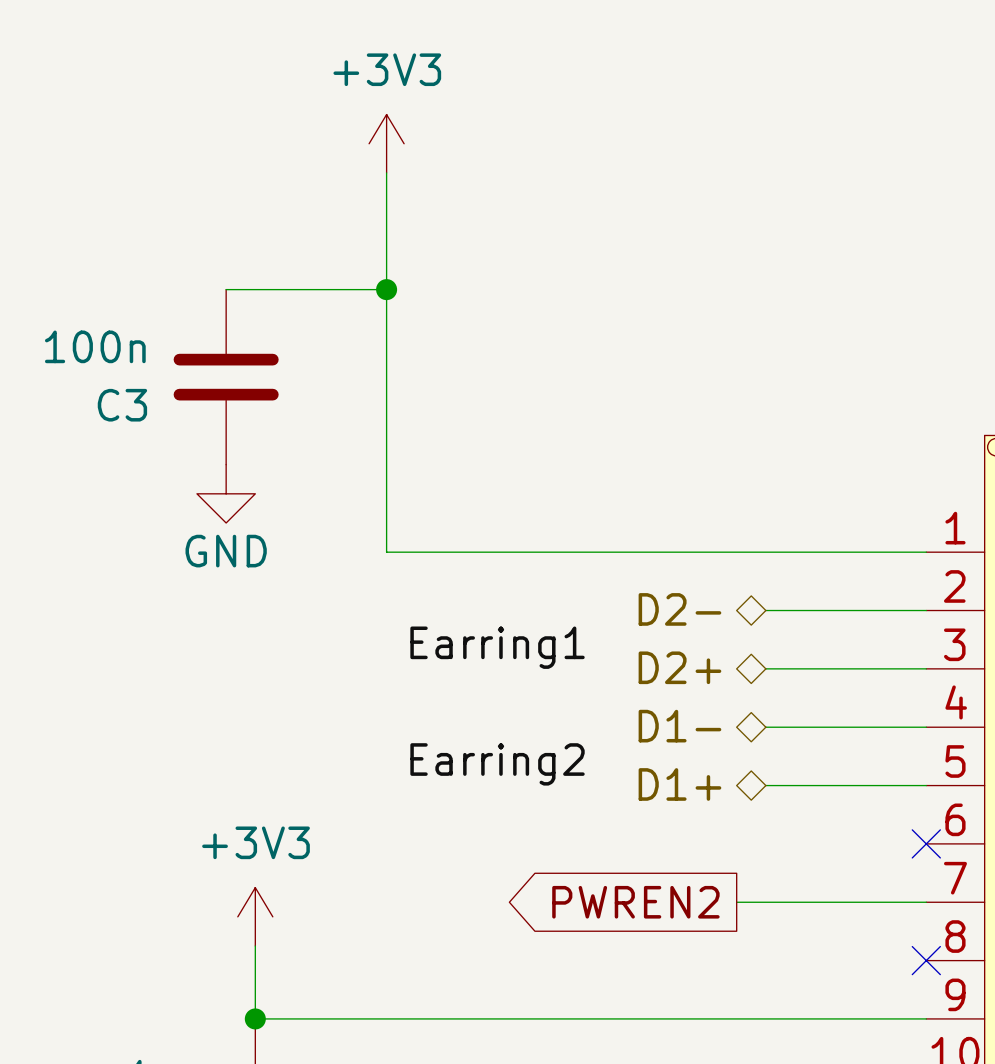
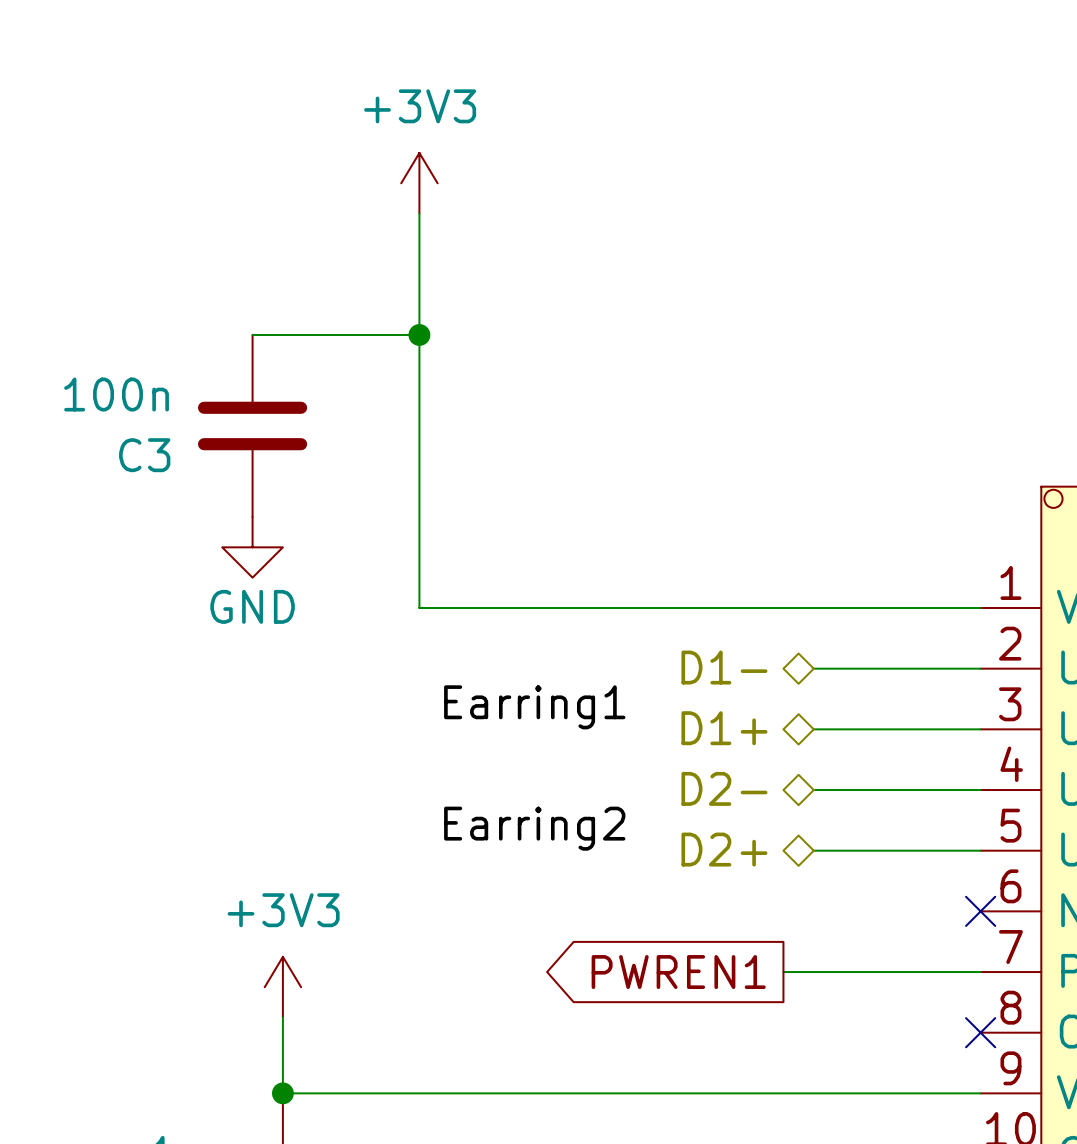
hierarchical label: D2- (679, 609) -> D1- (724, 667)
hierarchical label: D2+ (679, 667) -> D1+ (724, 728)
hierarchical label: D1- (679, 726) -> D2- (724, 788)
hierarchical label: D1+ (679, 784) -> D2+ (724, 849)
global label: PWREN2 (635, 902) -> PWREN1 (678, 972)

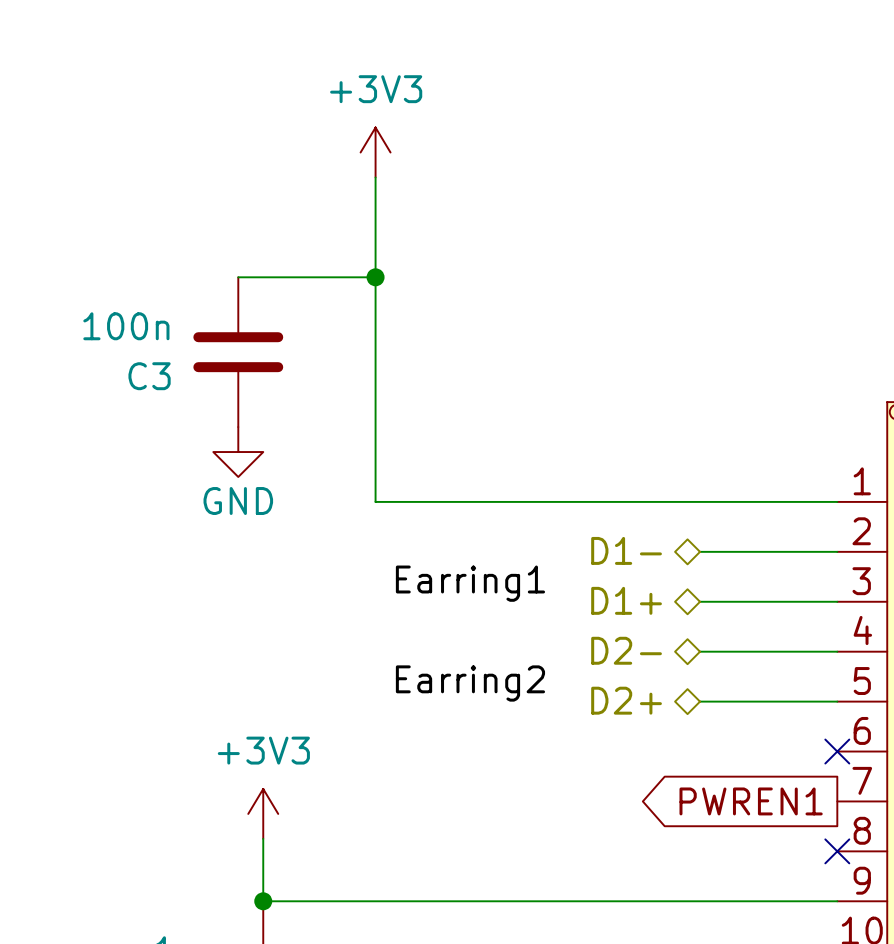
global label position: PWREN1 (678, 972) -> PWREN1 (751, 801)
wire: (783, 972) (980, 972) -> none

